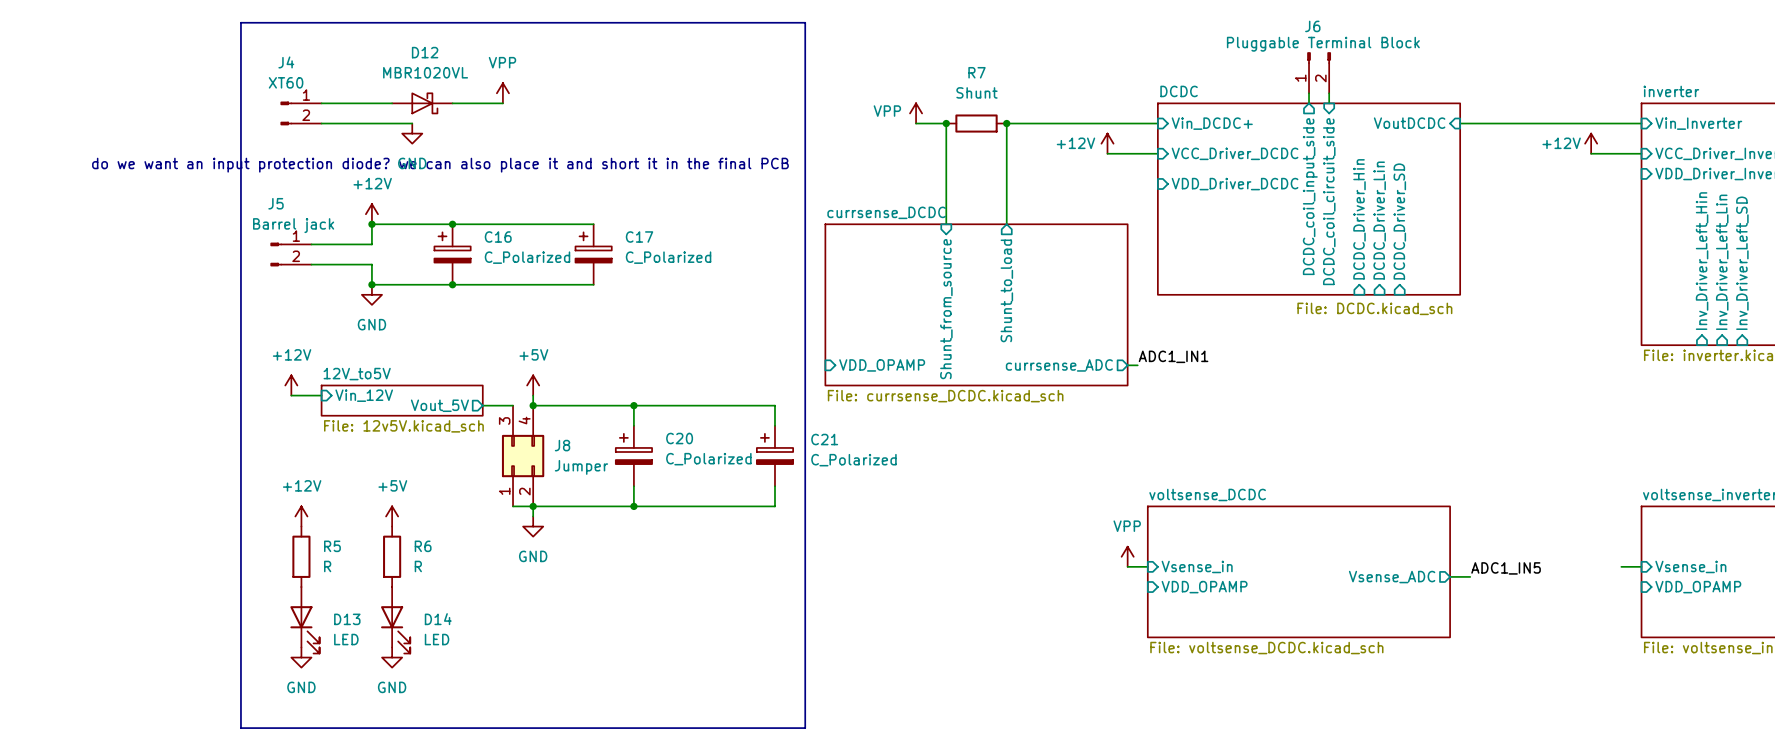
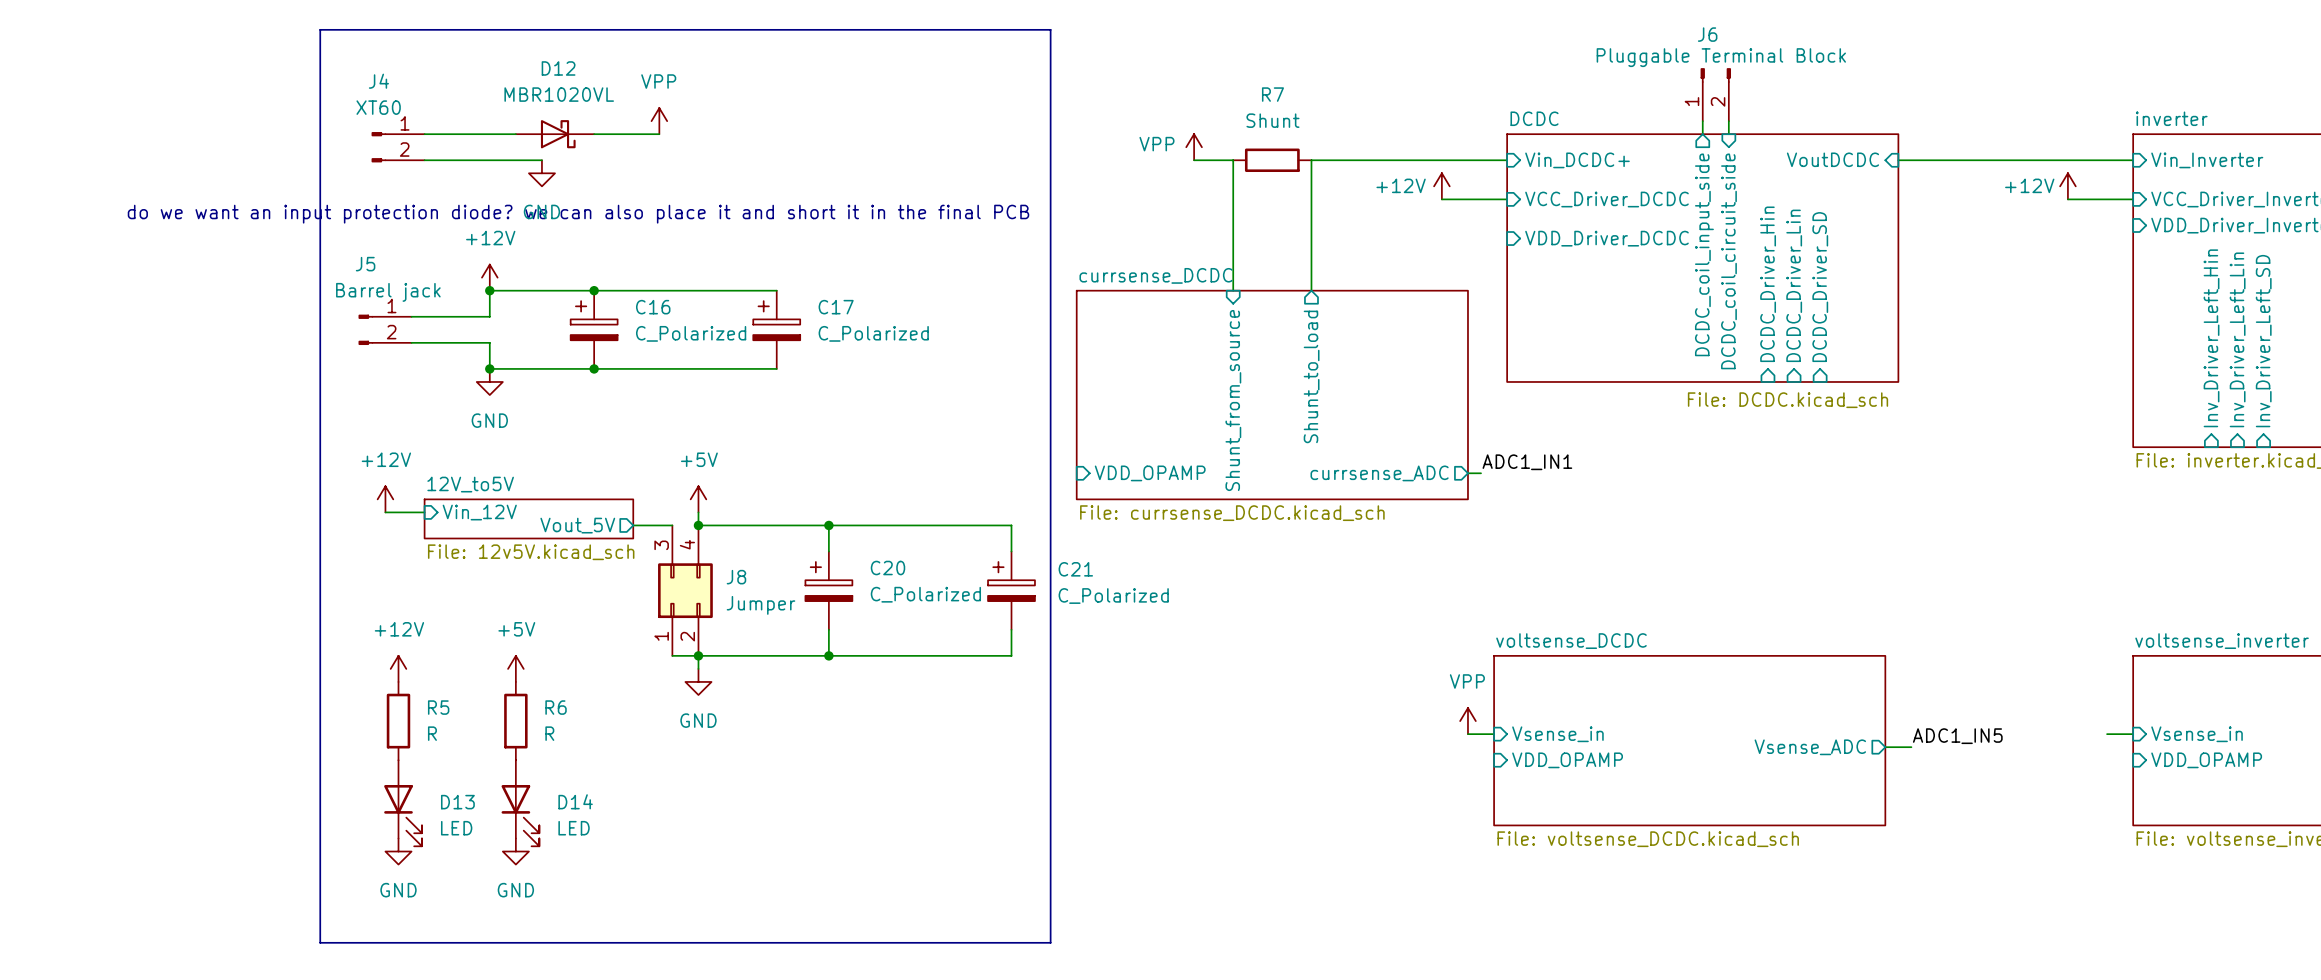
junction: (946, 123) -> none
junction: (1006, 123) -> none

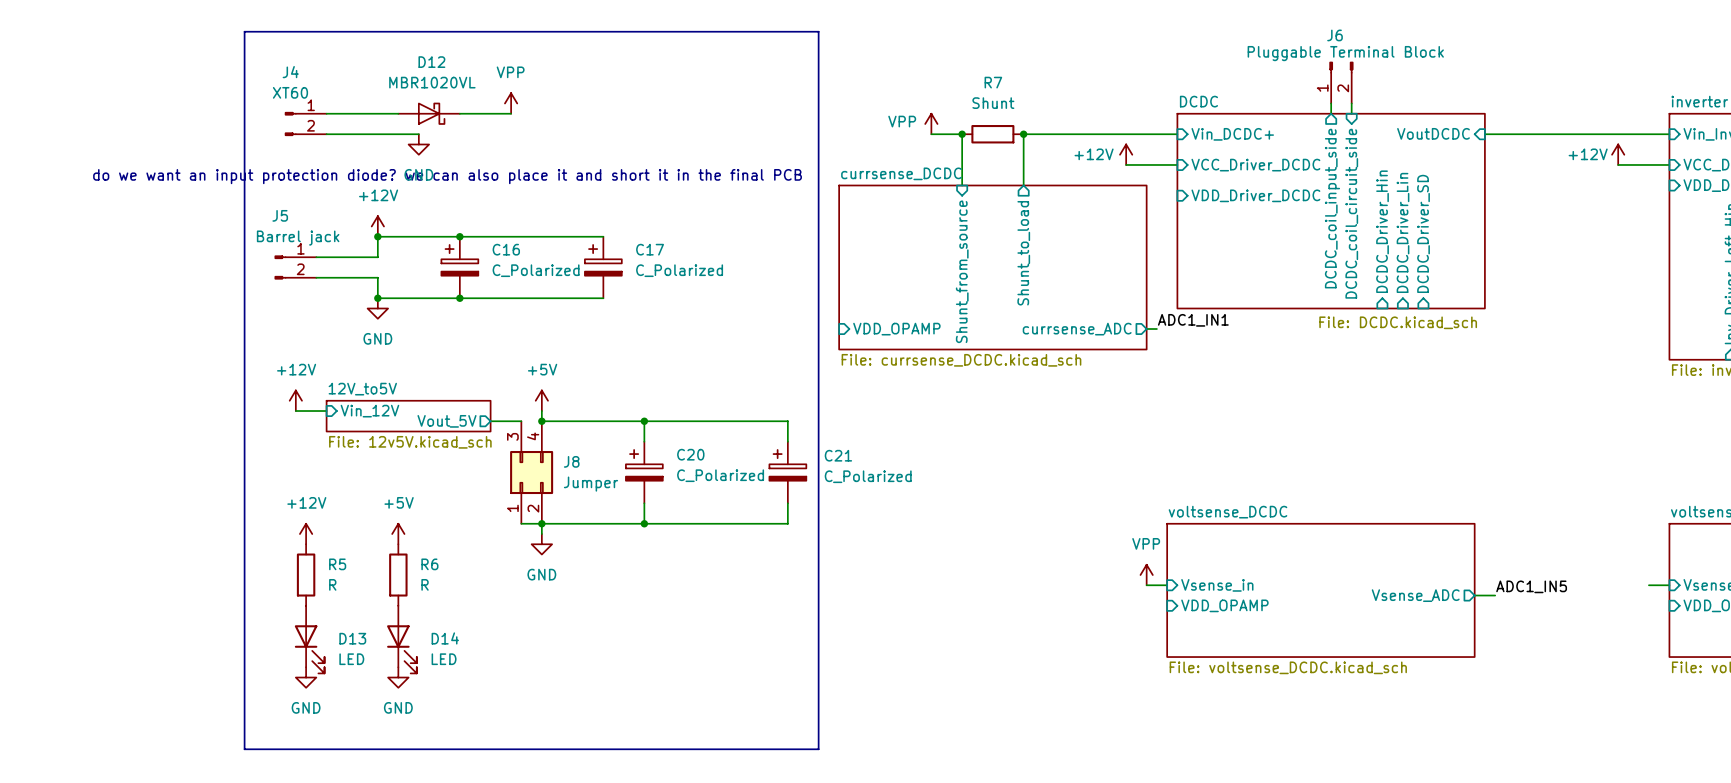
junction: none -> (962, 134)
junction: none -> (1023, 134)
wire: (1233, 225) (1233, 290) -> none
wire: (1311, 225) (1311, 290) -> none
sheet pin position: Shunt_to_load (1311, 376) -> Shunt_to_load (1023, 253)
sheet currsense_DCDC position: (1272, 395) -> (992, 267)
sheet pin position: Shunt_from_source (1233, 400) -> Shunt_from_source (962, 271)
label position: ADC1_IN1 (1527, 462) -> ADC1_IN1 (1193, 320)
sheet pin position: VDD_OPAMP (1150, 473) -> VDD_OPAMP (896, 329)
sheet pin position: currsense_ADC (1379, 473) -> currsense_ADC (1077, 329)
wire: (1467, 473) (1481, 473) -> (1146, 329) (1156, 329)

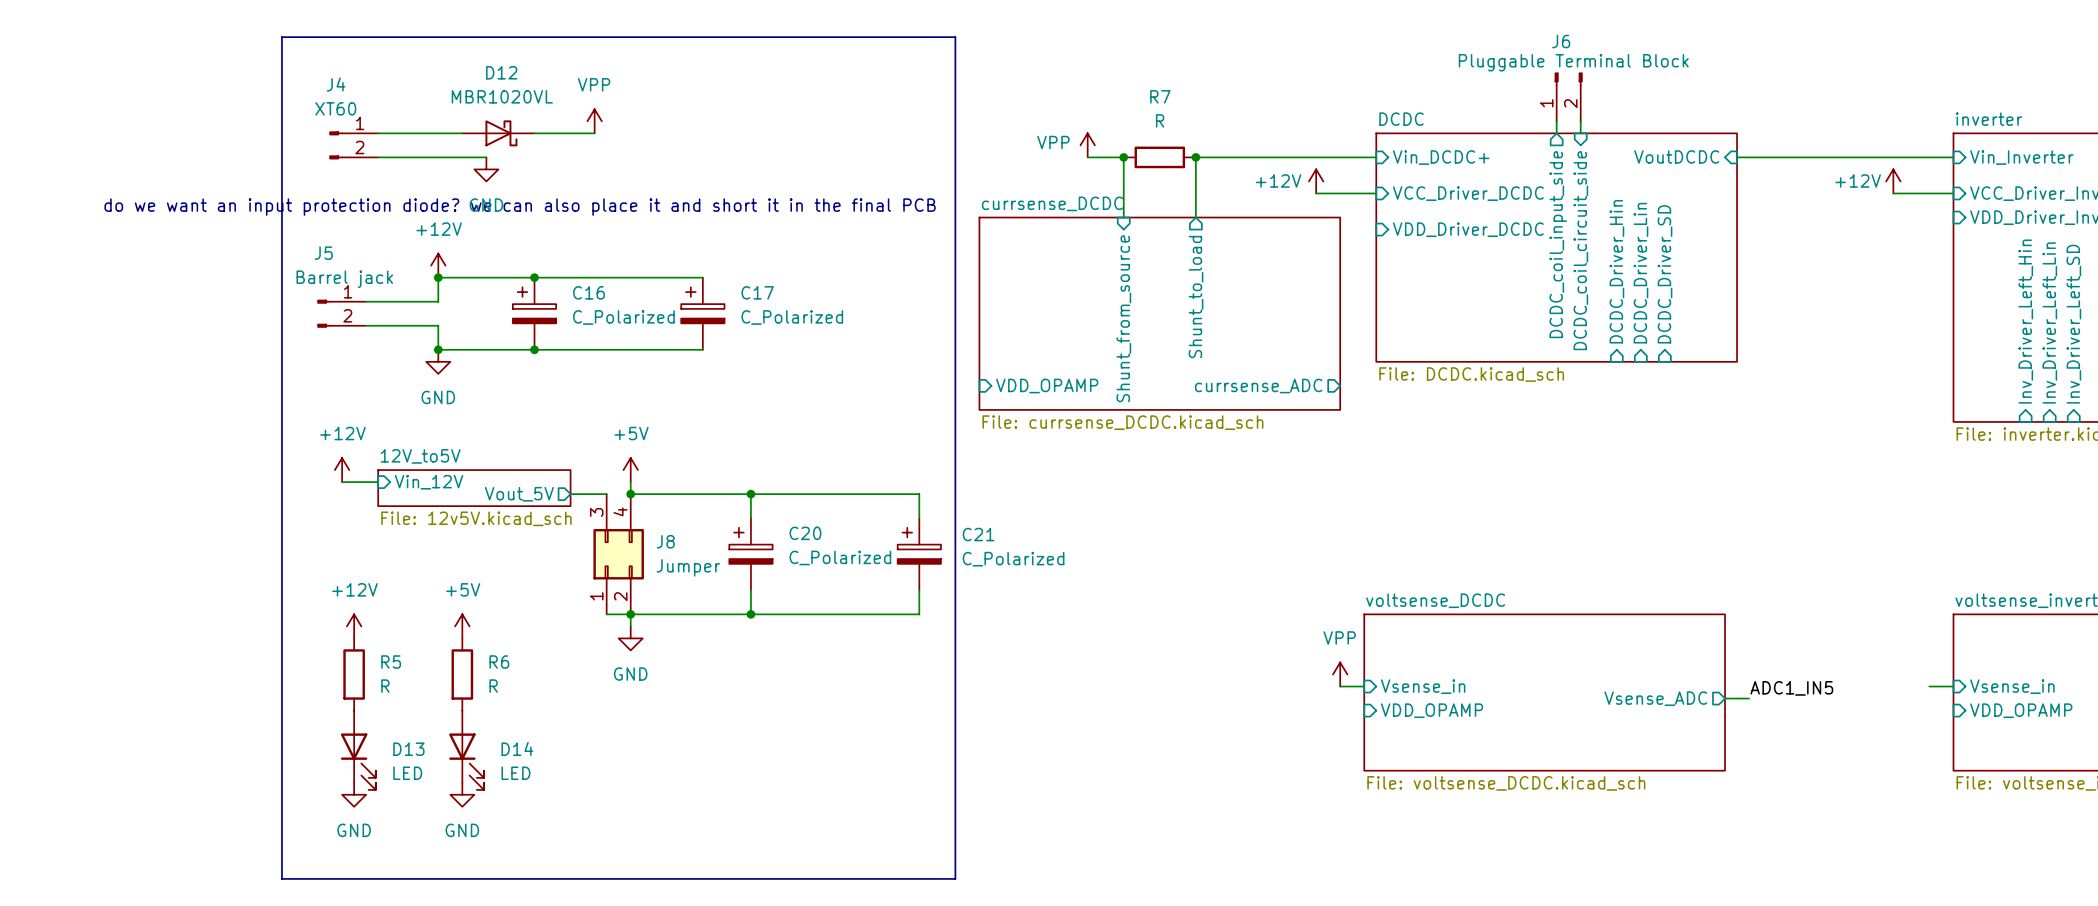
R7 value: Shunt (993, 103) -> R (1160, 120)
label: ADC1_IN1 (1193, 320) -> none
sheet DCDC value position: File: DCDC.kicad_sch (1398, 322) -> File: DCDC.kicad_sch (1471, 374)
wire: (1146, 329) (1156, 329) -> none

